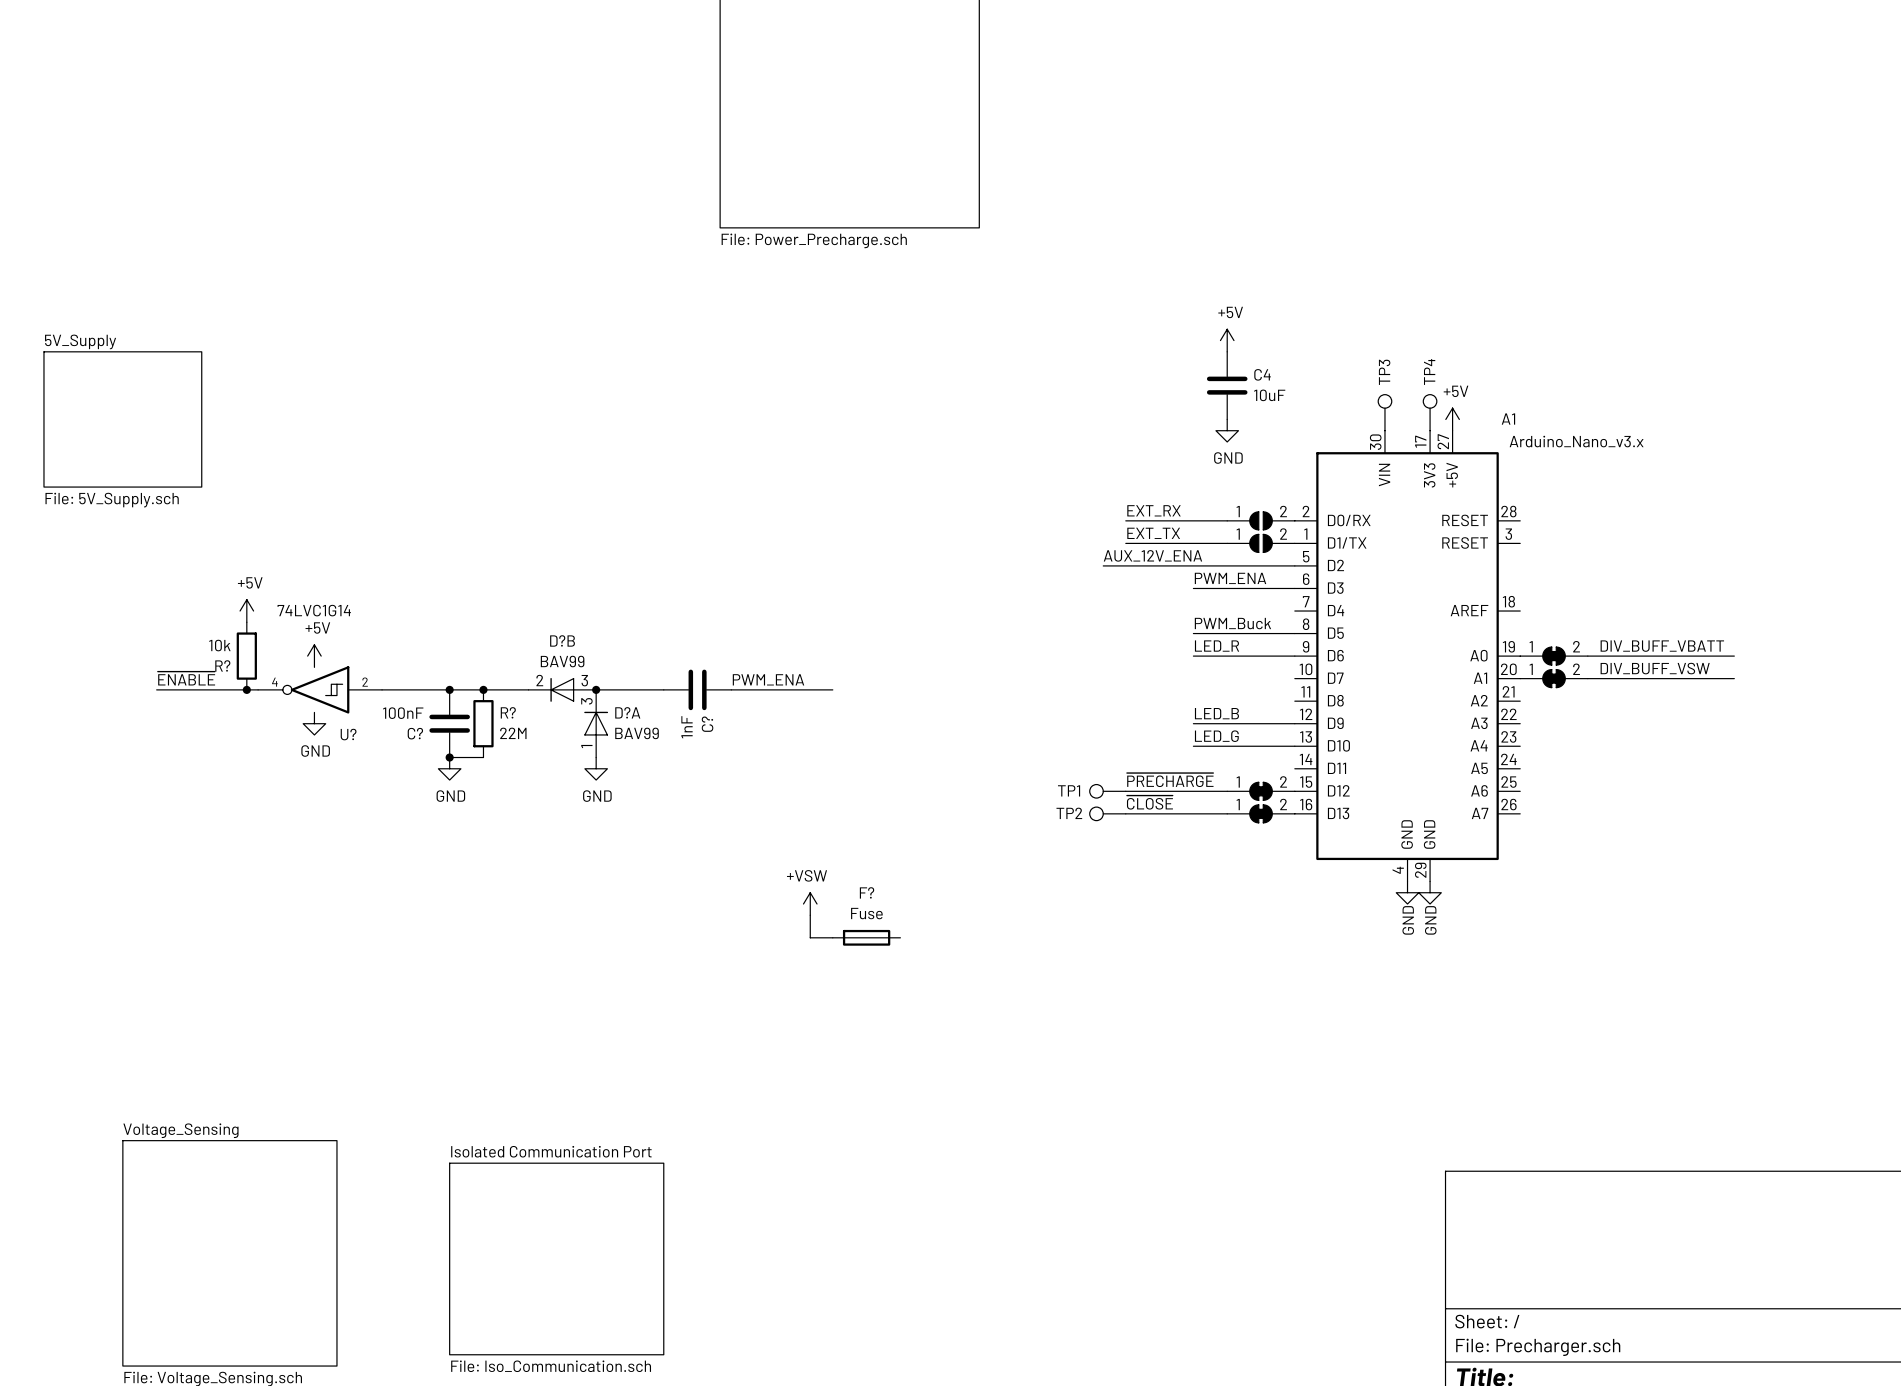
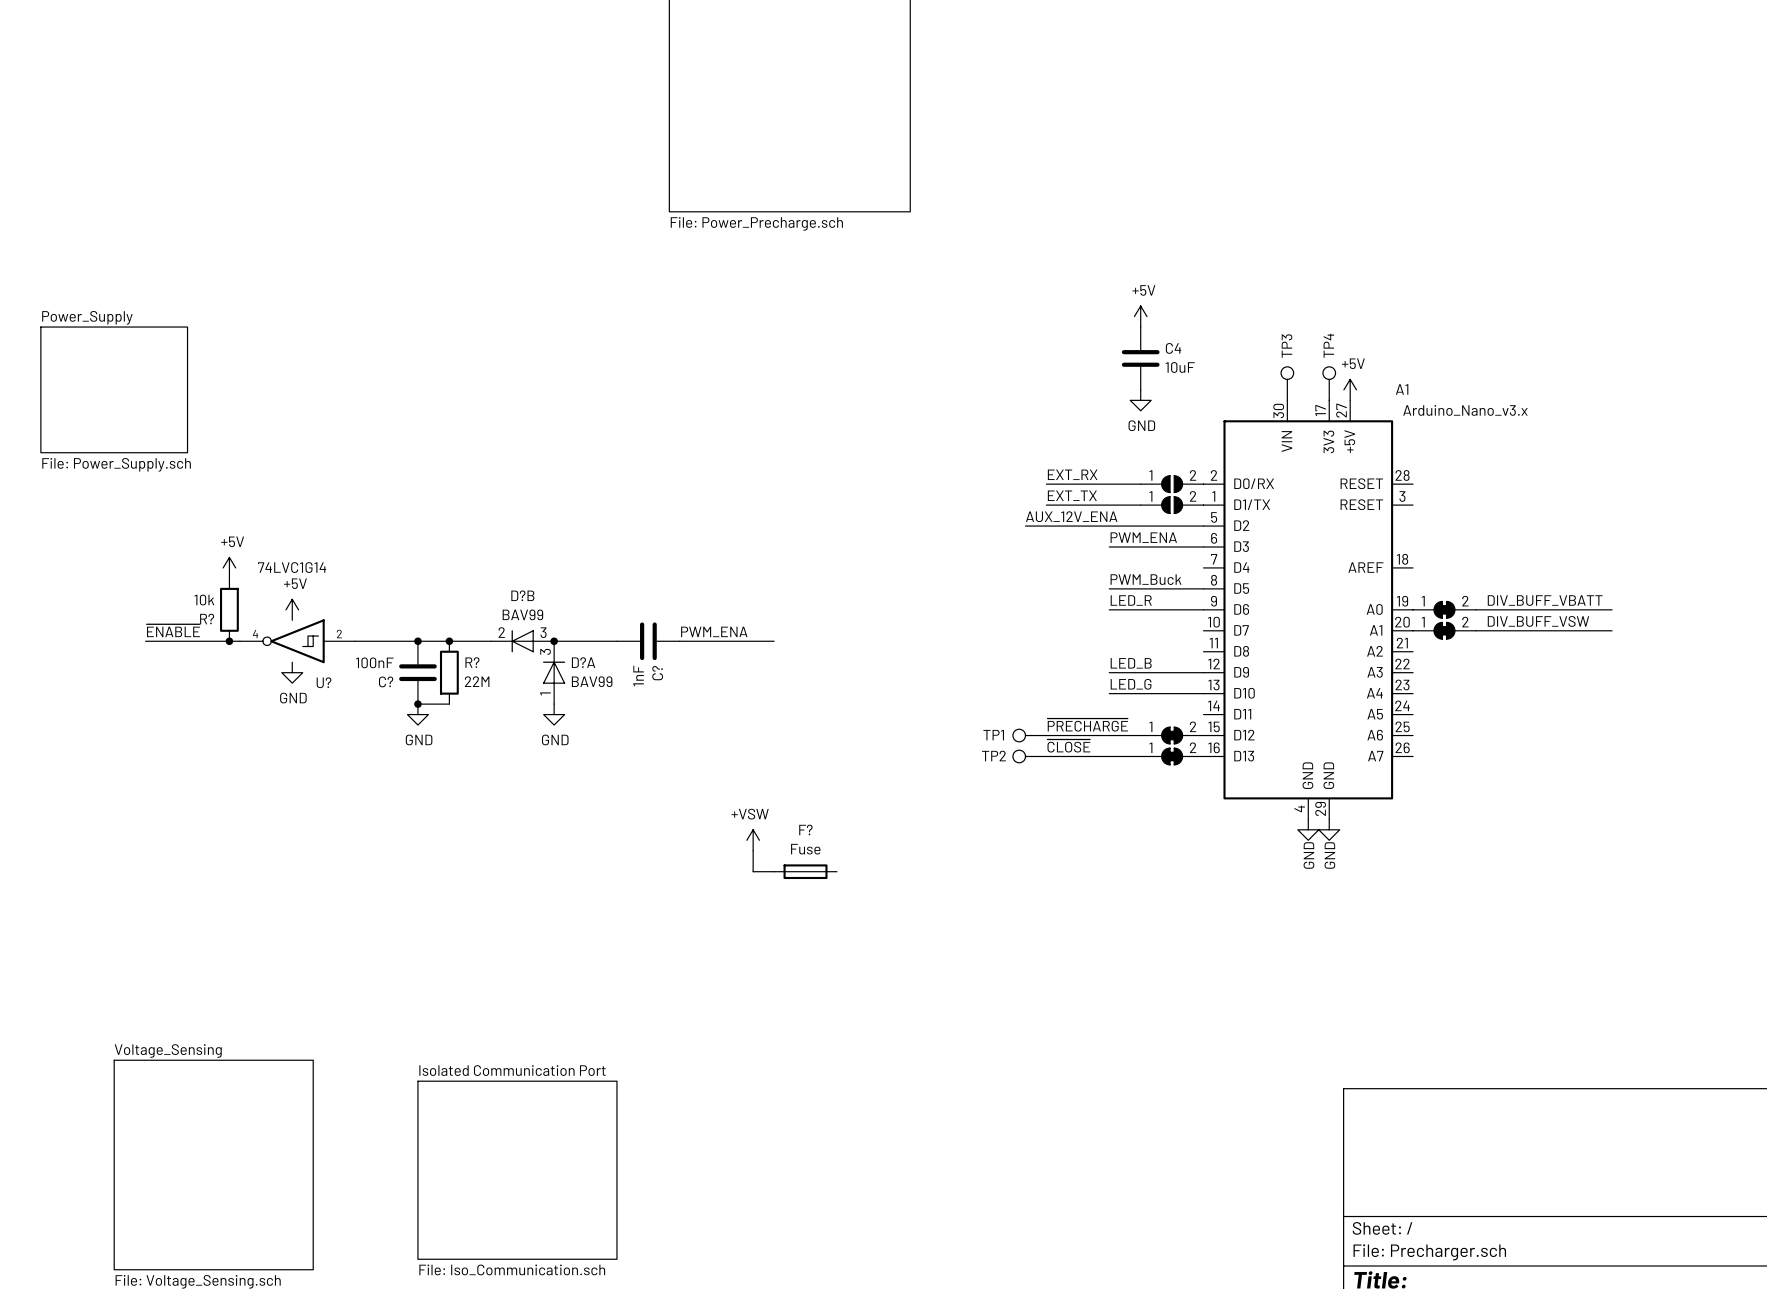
sheet 5V_Supply name: 5V_Supply (80, 341) -> Power_Supply (87, 317)
sheet 5V_Supply value: File: 5V_Supply.sch (112, 500) -> File: Power_Supply.sch (116, 464)

